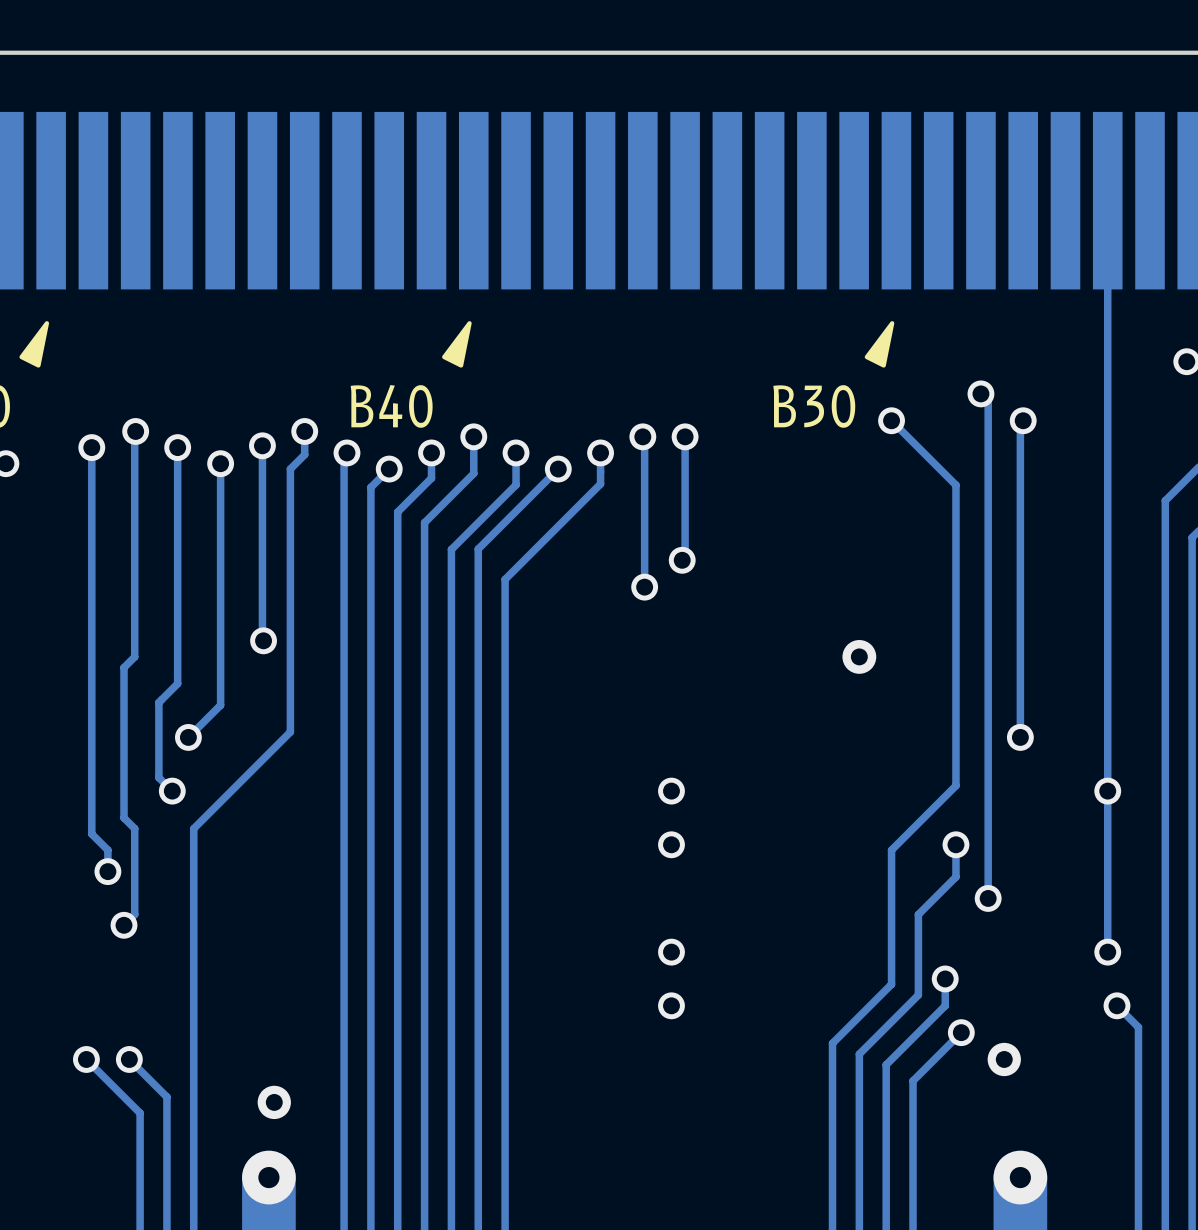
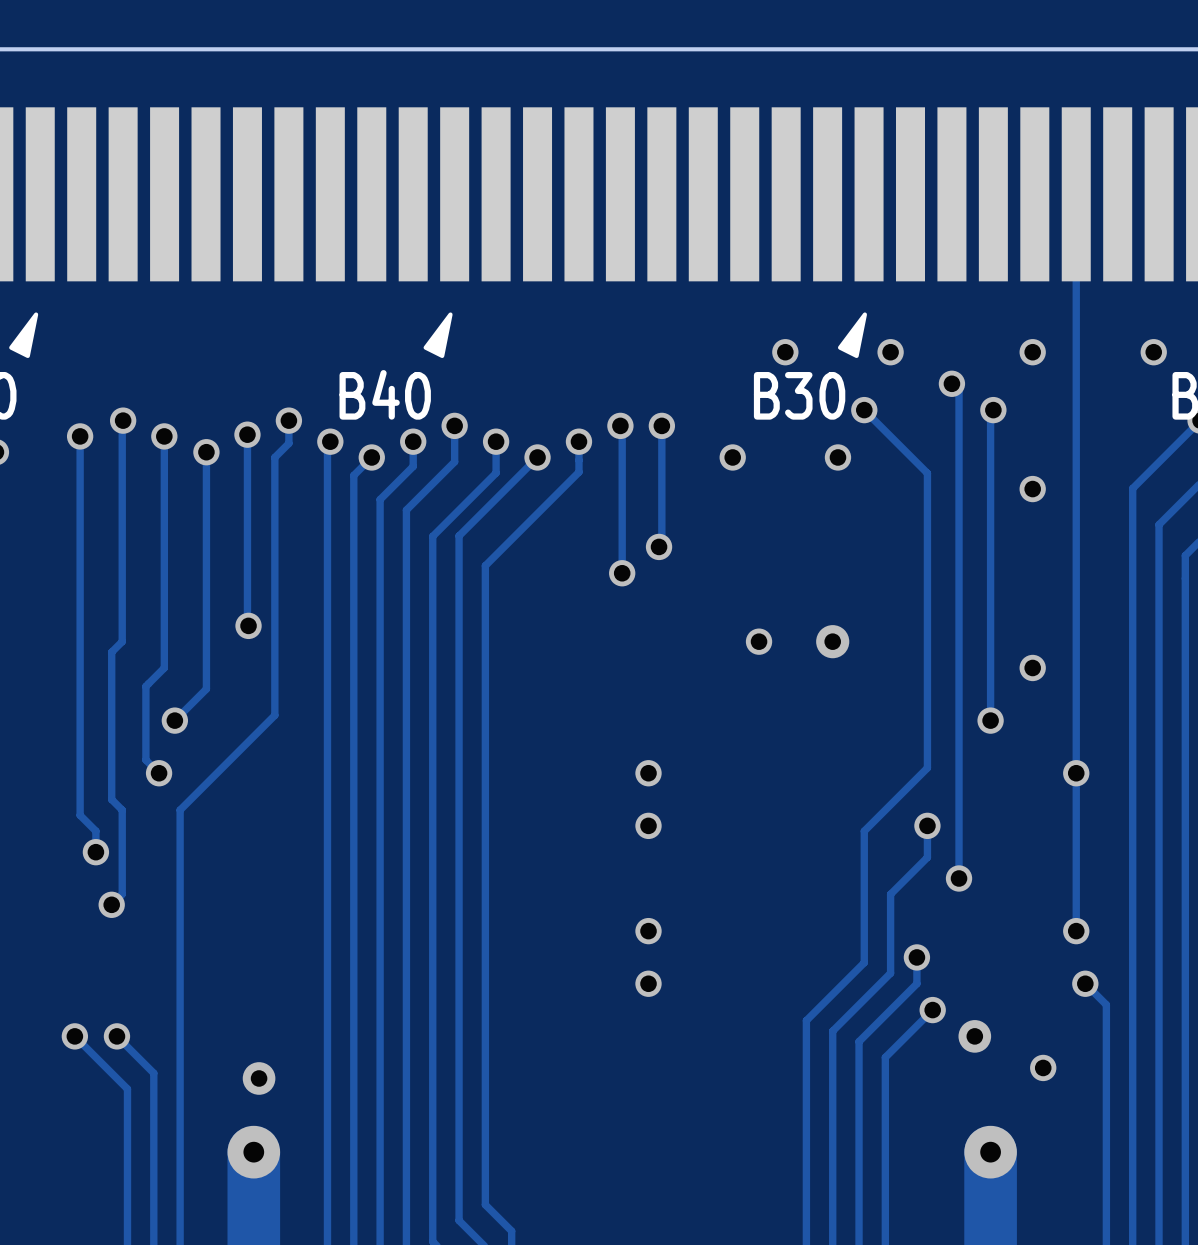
via: none -> (785, 352)
via: none -> (890, 352)
via: none -> (1032, 352)
via: none -> (732, 457)
via: none -> (837, 457)
via: none -> (1032, 489)
via: none -> (759, 641)
via: none -> (1032, 667)
via: none -> (1043, 1067)

